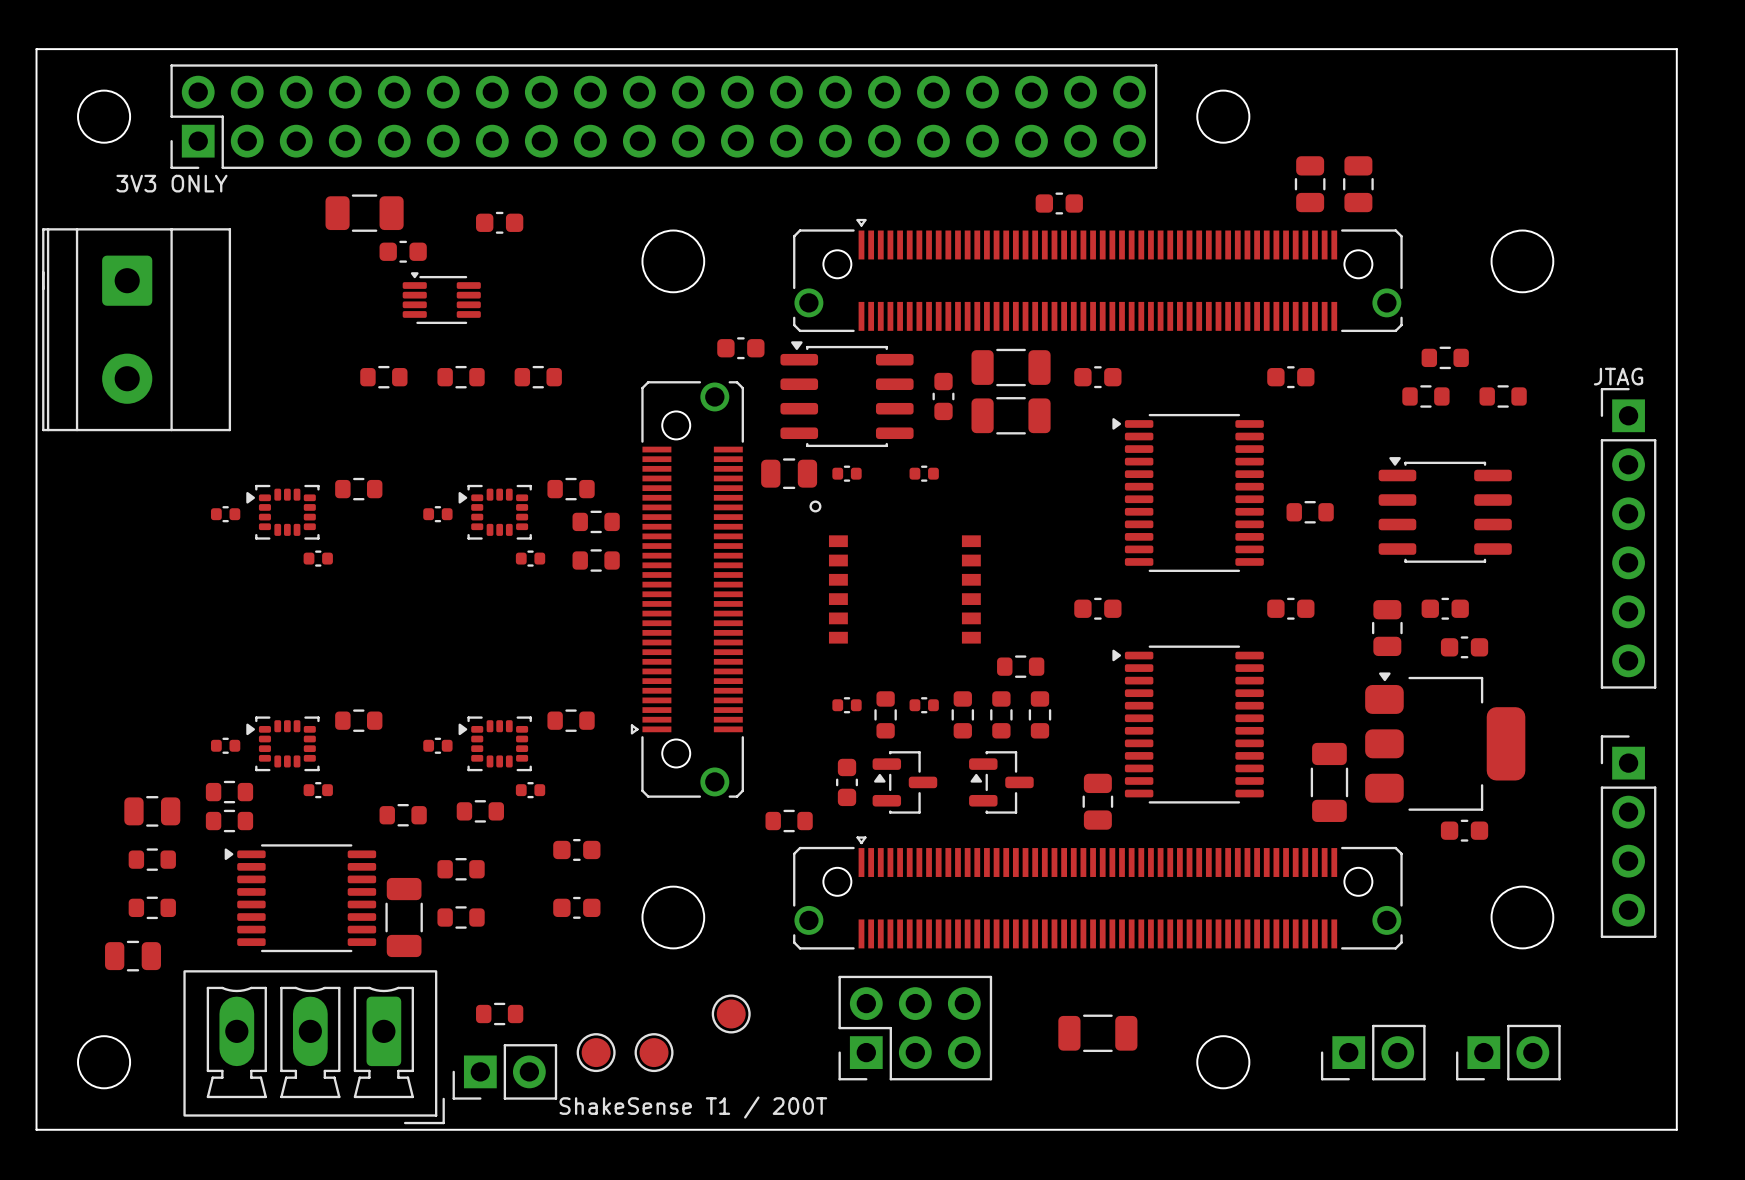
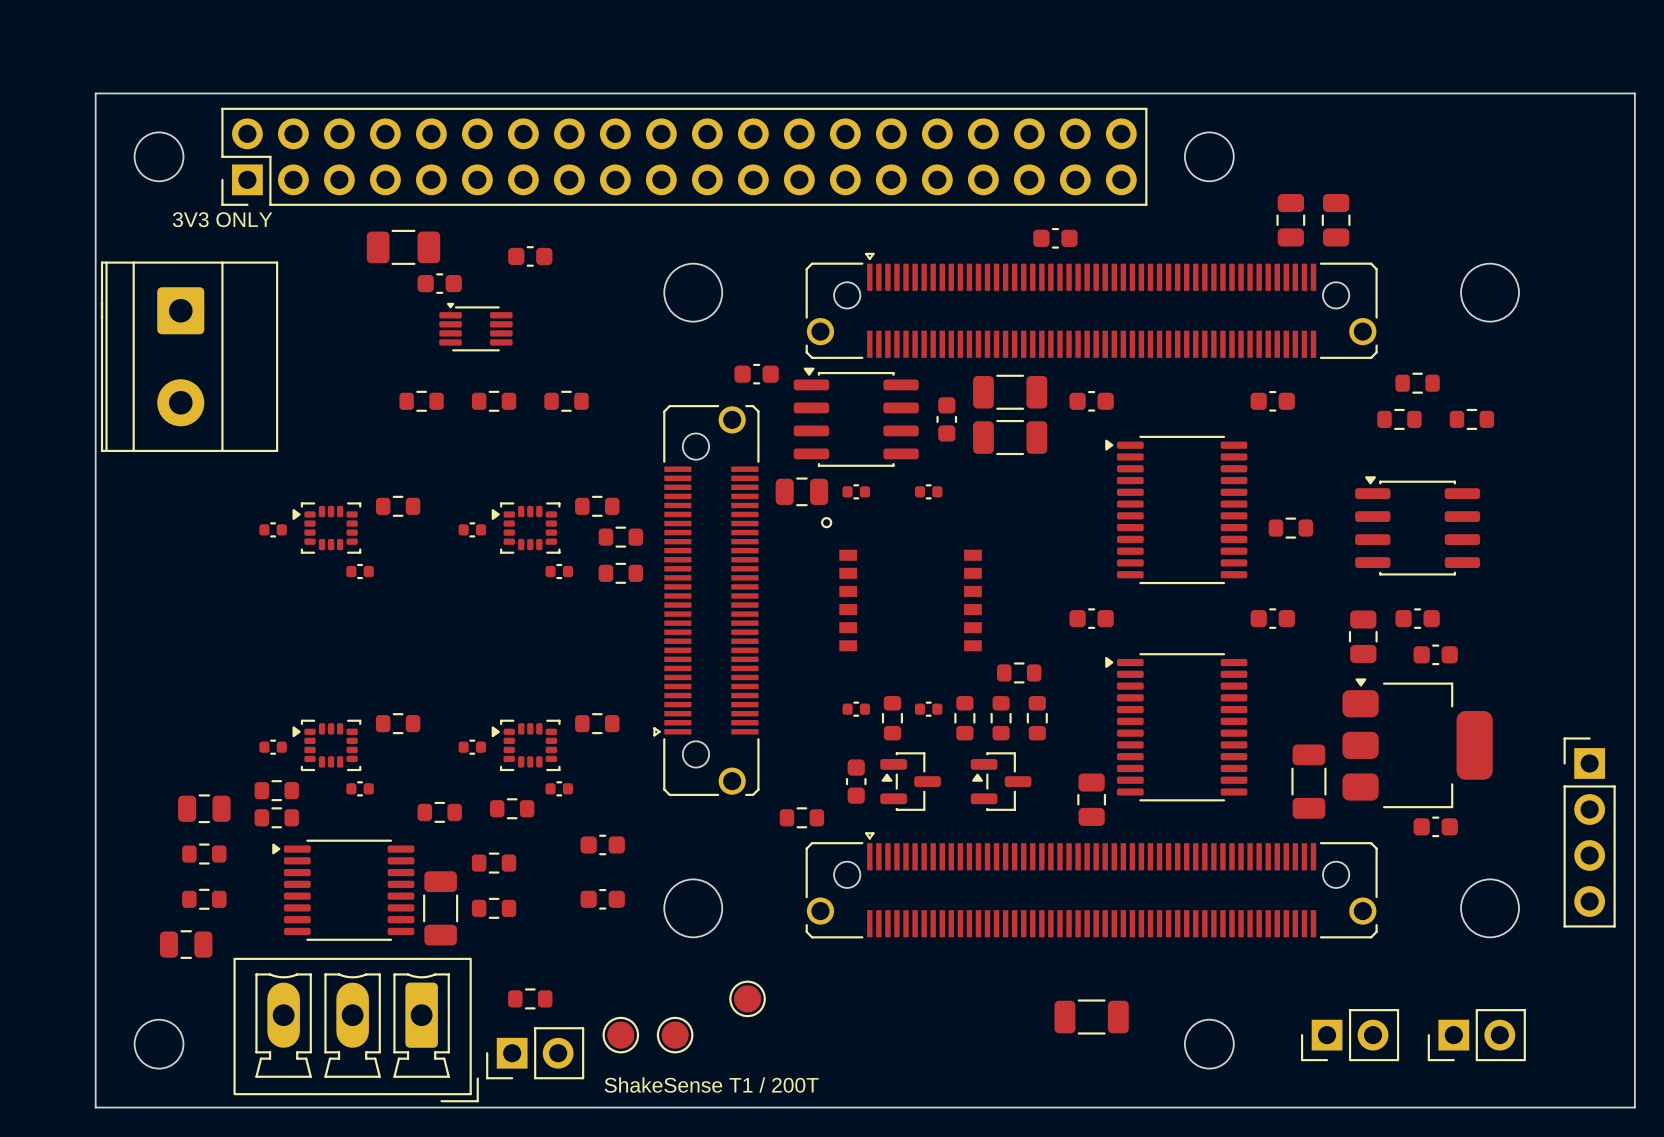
text: JTAG (1618, 376) -> none
part: (1628, 538) -> none
part: (915, 1028) -> none

